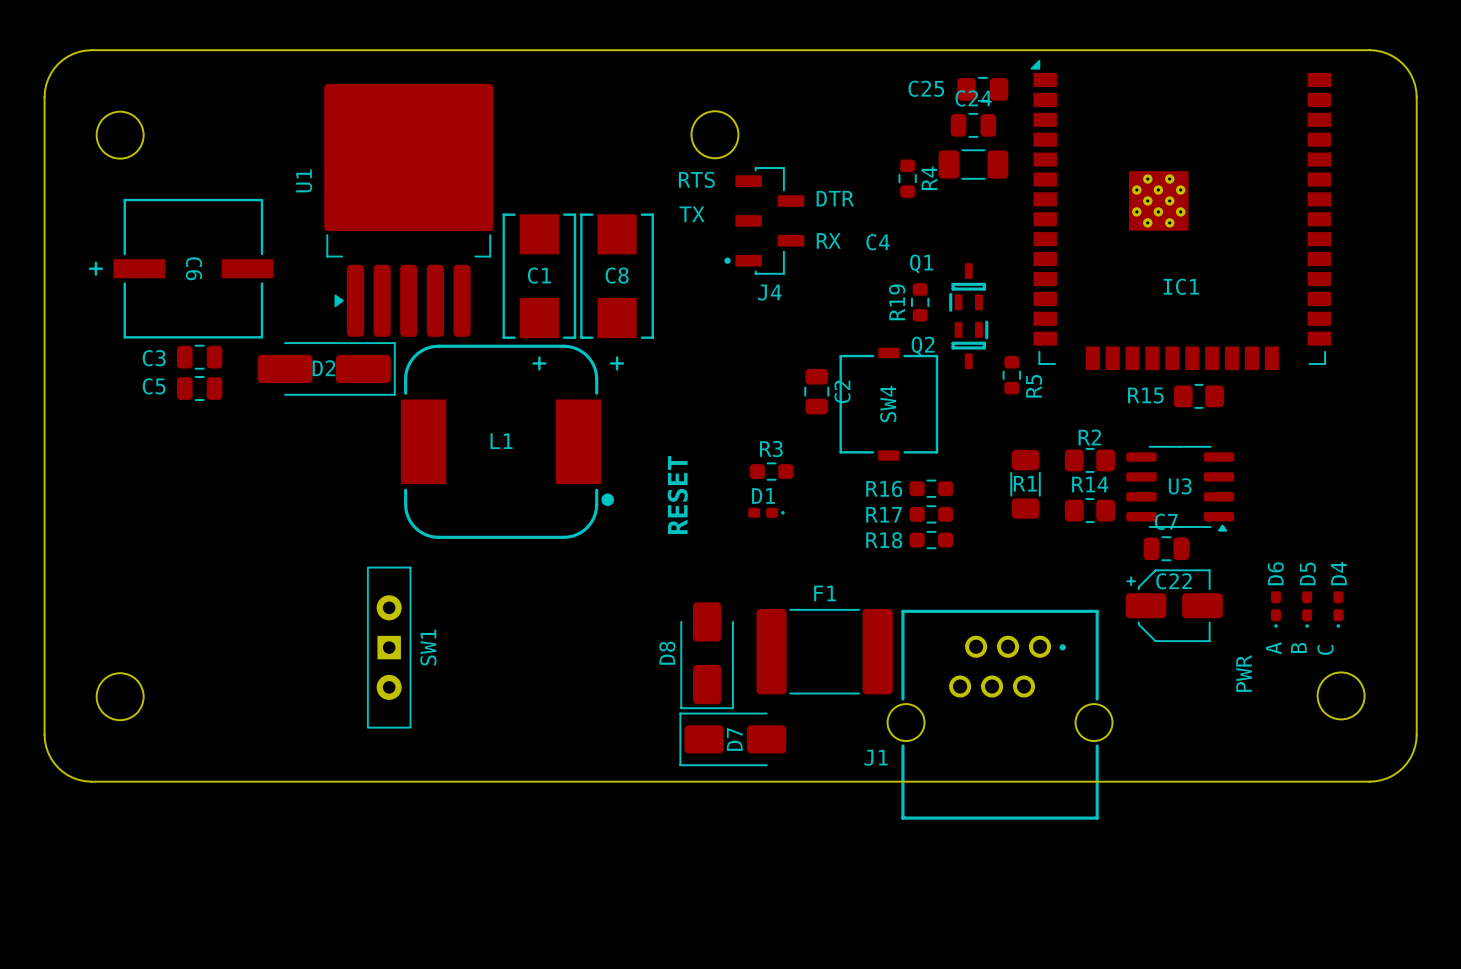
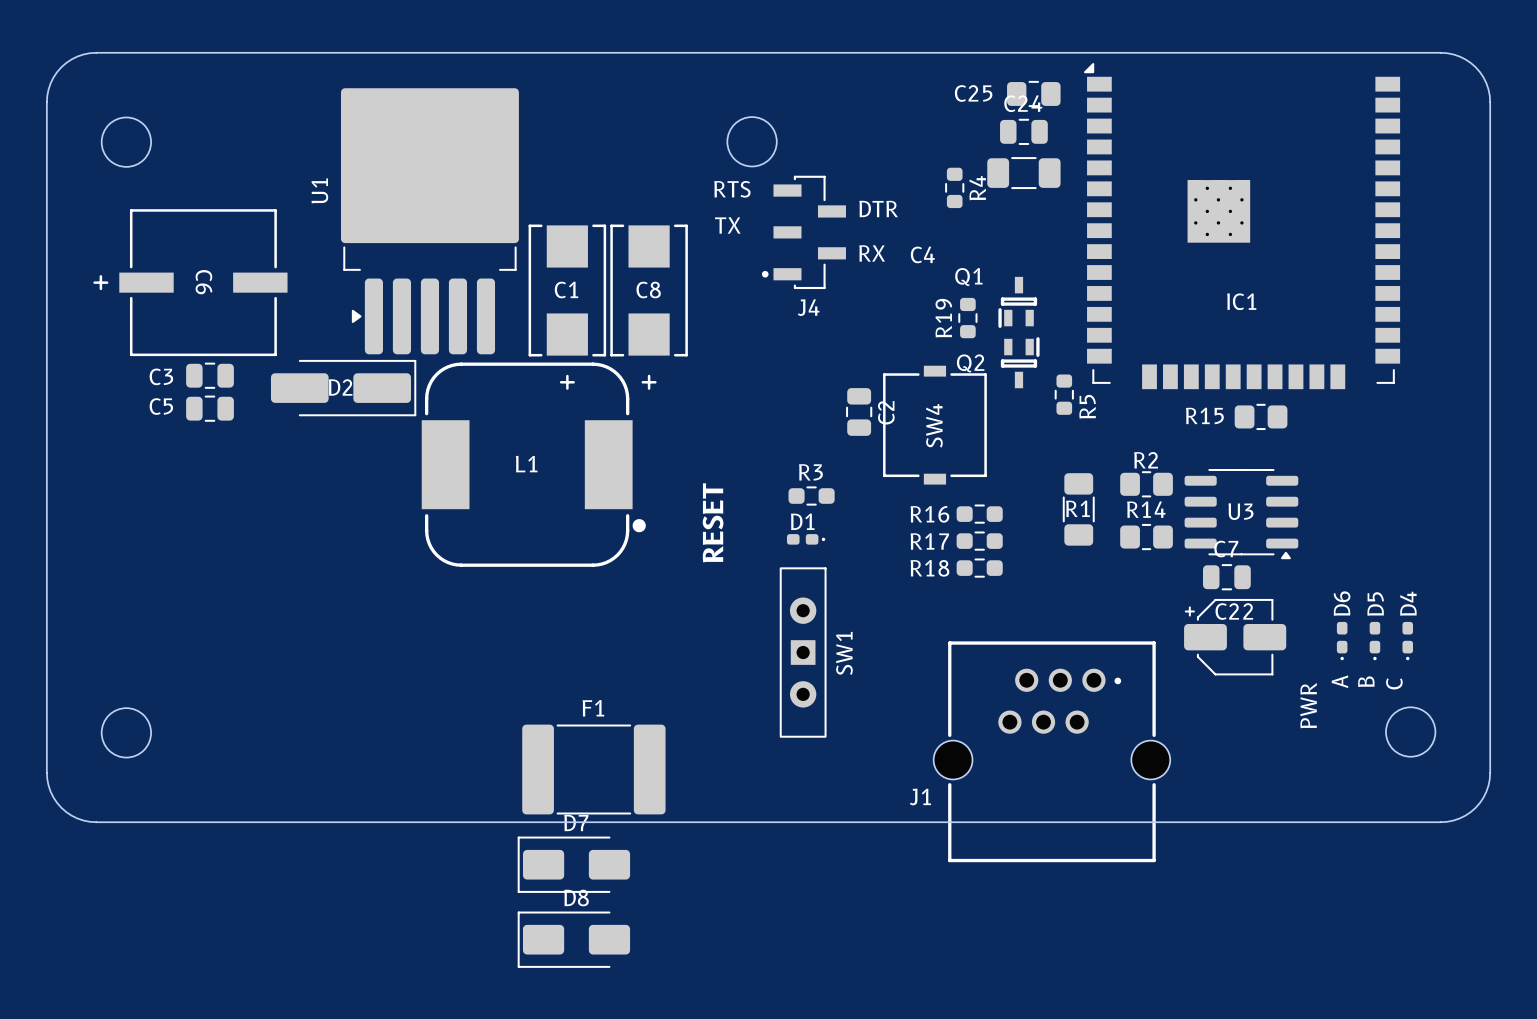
SW1 position: (389, 647) -> (803, 652)
F1 position: (824, 651) -> (593, 769)
D8 rotation: 0° (707, 655) -> 90° clockwise (573, 939)
D8 position: (707, 655) -> (573, 939)
D7 position: (732, 739) -> (573, 864)
D7 name rotation: 0° (734, 739) -> 90° clockwise (576, 822)

